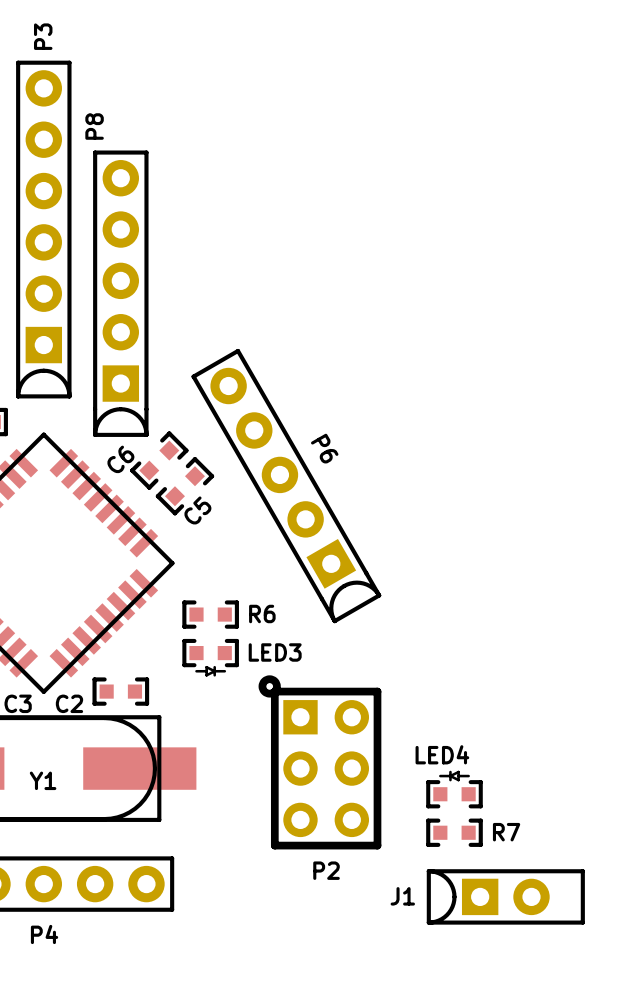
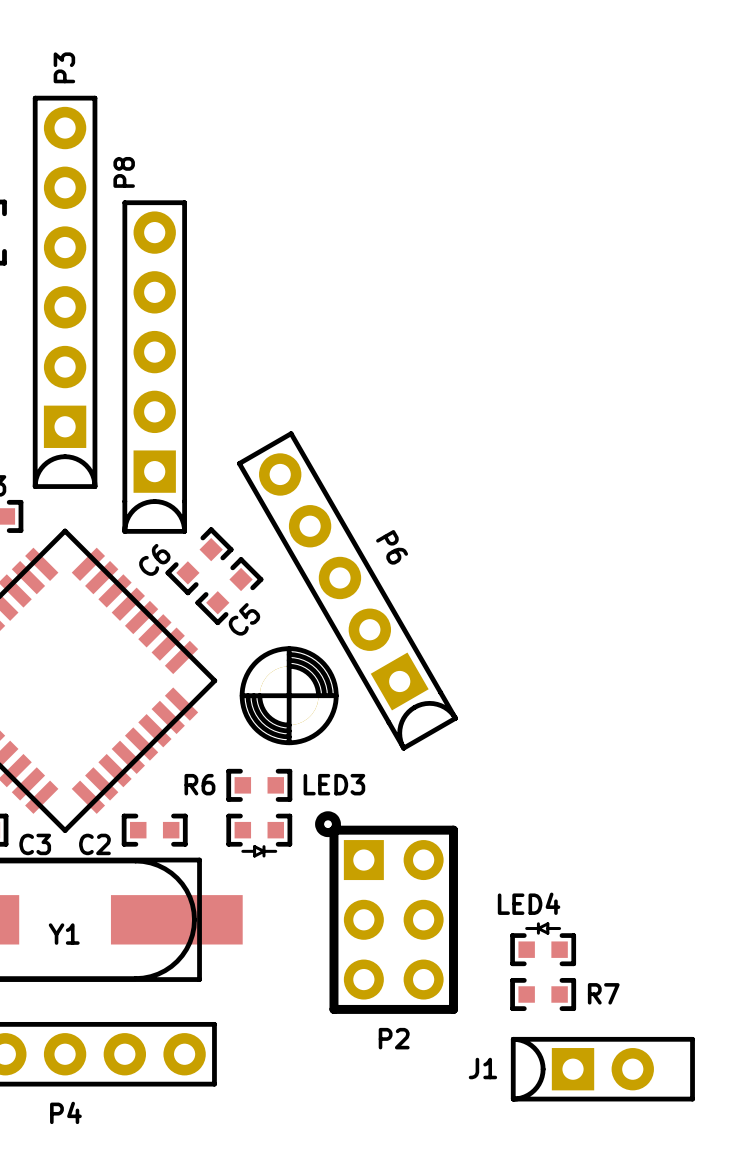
part: none -> (289, 695)
R6 name position: R6 (262, 613) -> R6 (199, 784)
R6 position: (210, 614) -> (259, 785)
LED3 position: (210, 657) -> (259, 835)

